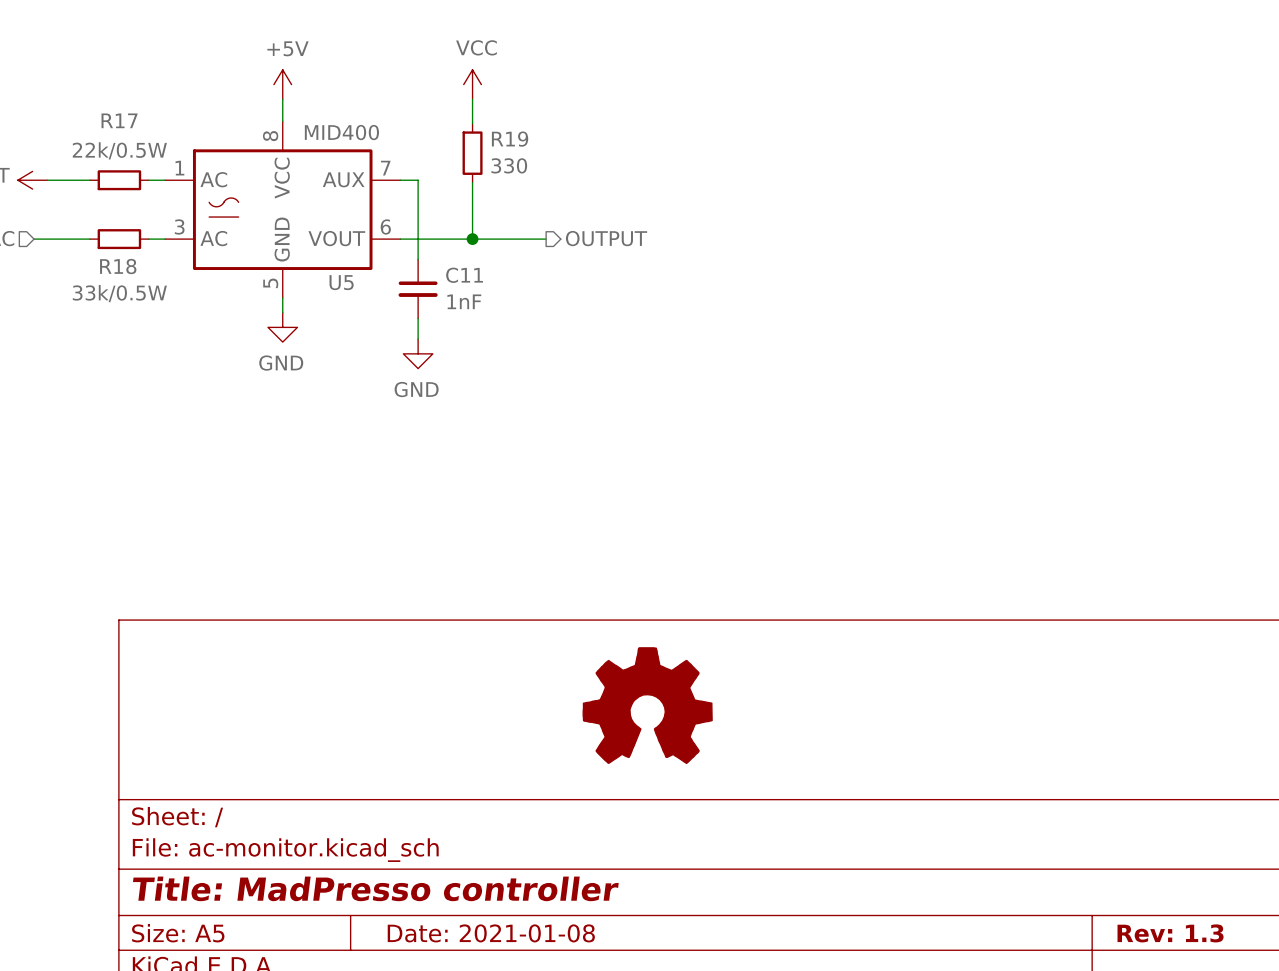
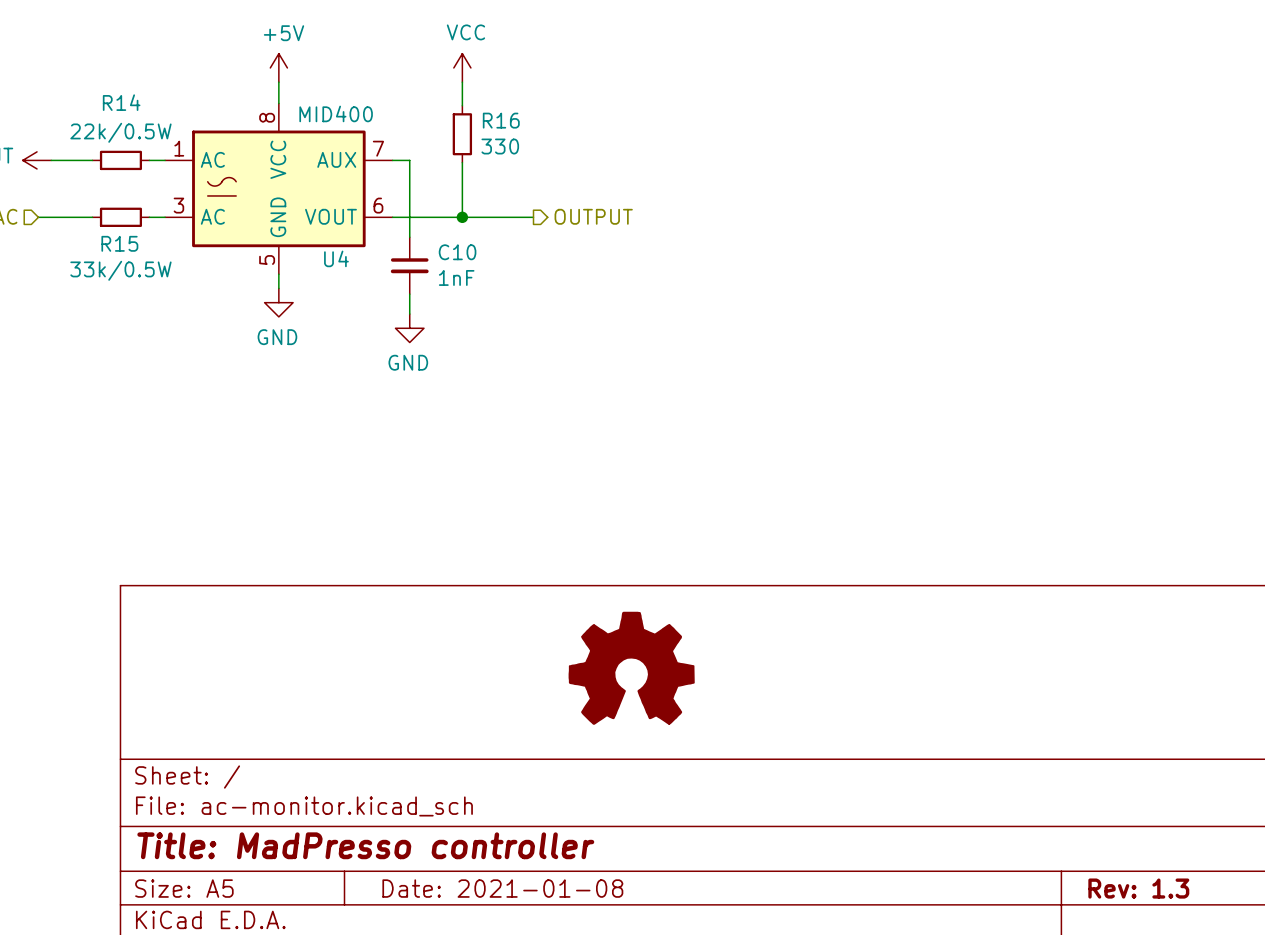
R17 name: R17 (119, 120) -> R14 (121, 102)
R19 name: R19 (510, 139) -> R16 (501, 120)
R18 name: R18 (118, 266) -> R15 (119, 243)
C11 name: C11 (464, 275) -> C10 (457, 252)
U5 name: U5 (341, 282) -> U4 (336, 258)

